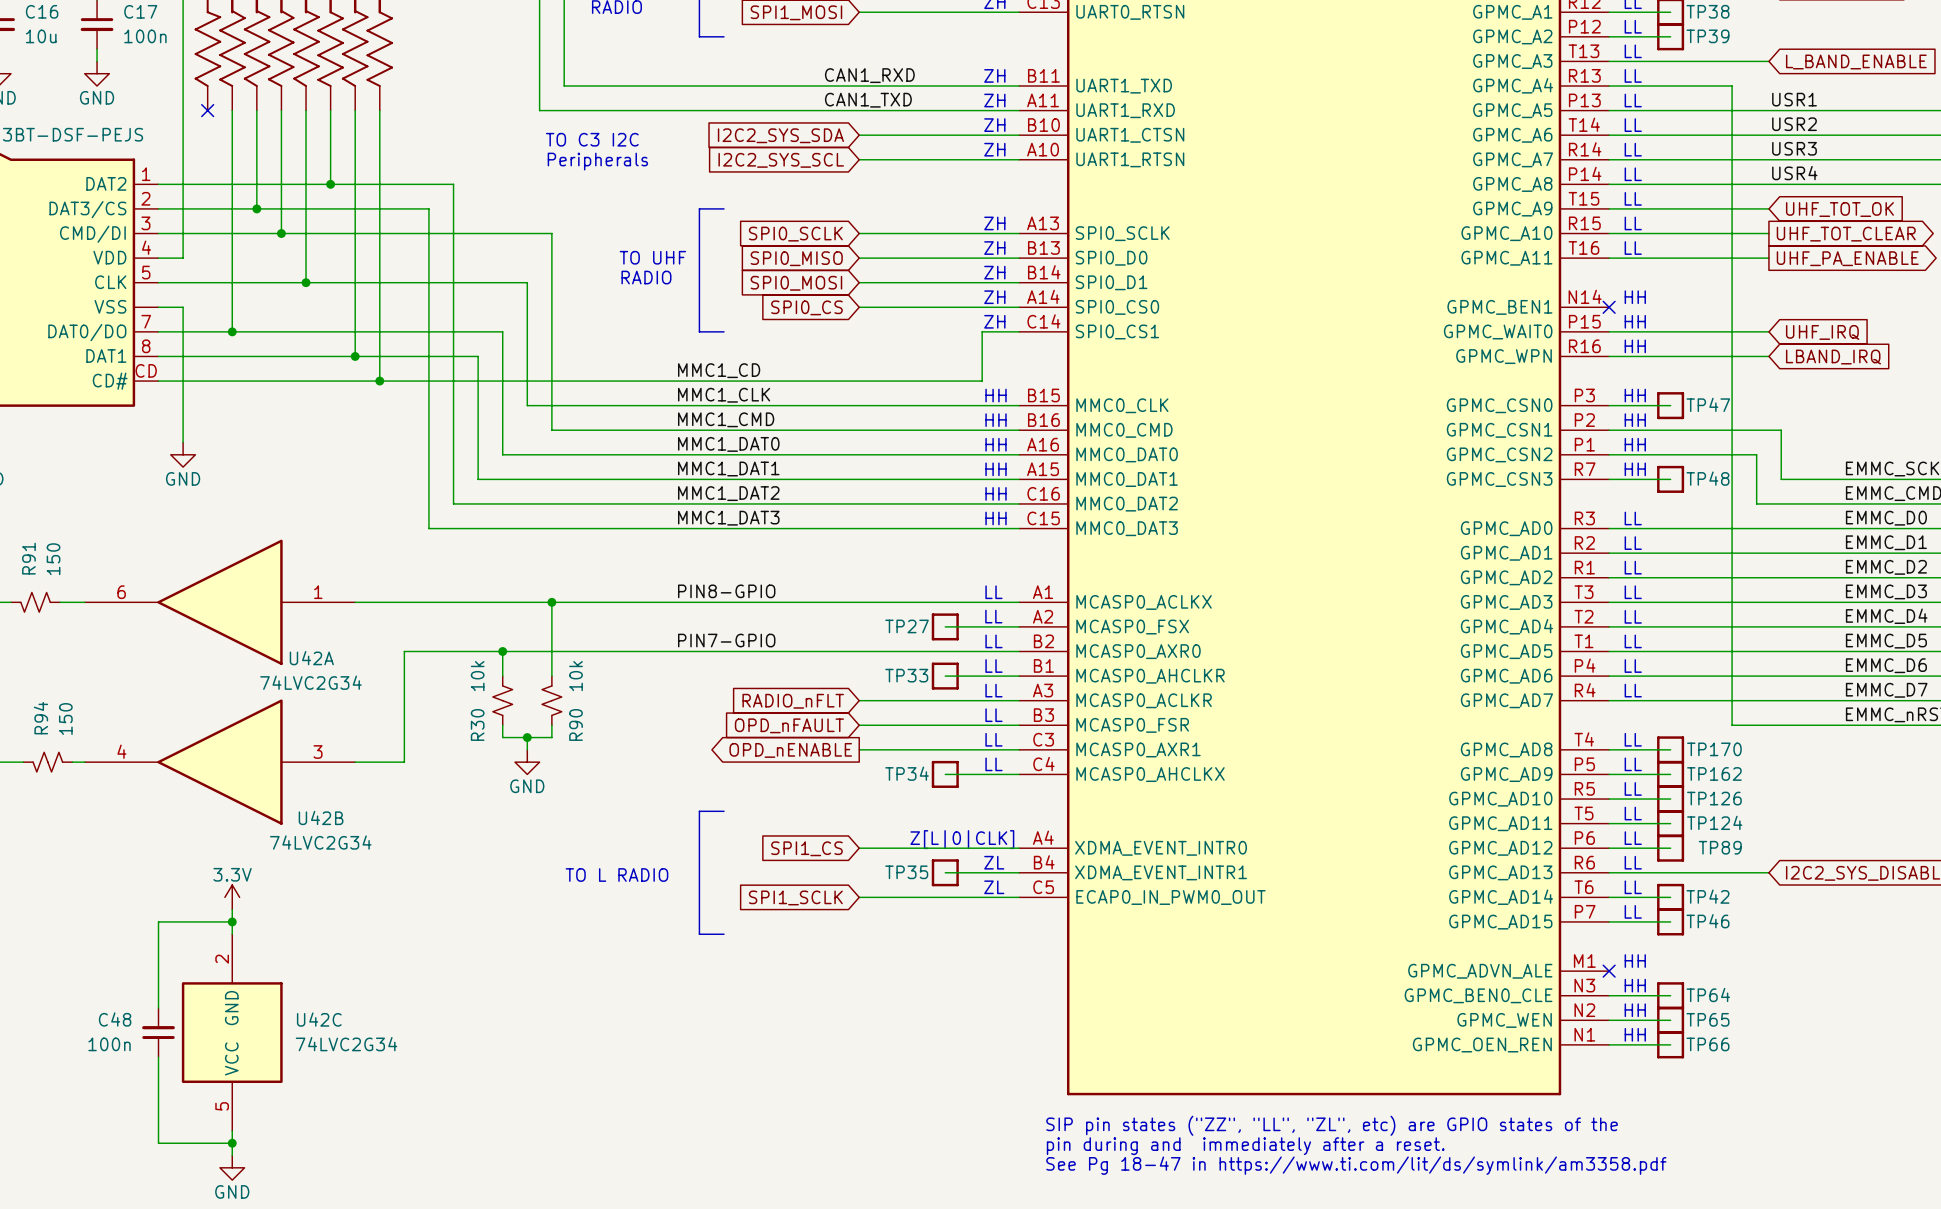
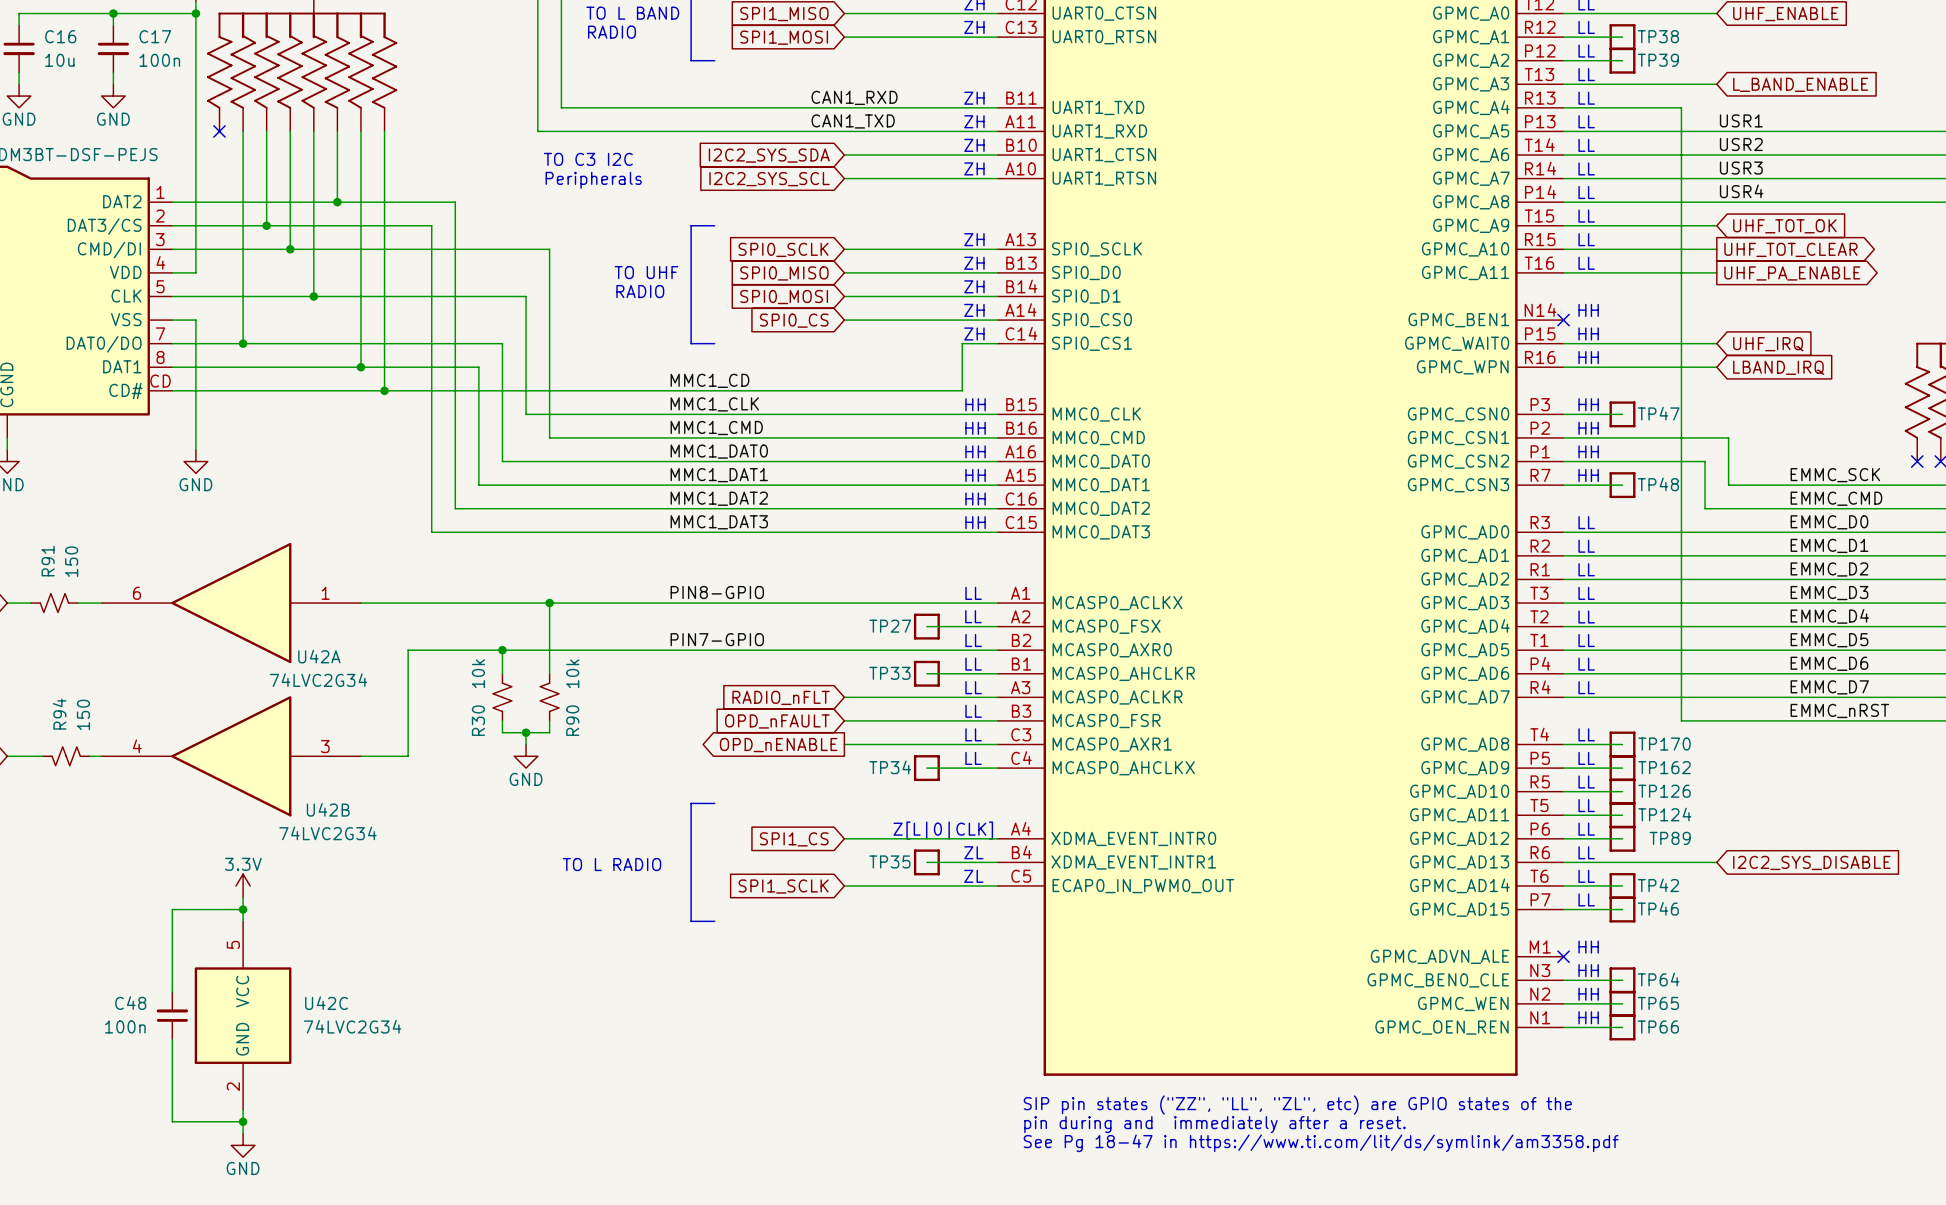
U42C rotation: 0° (232, 1032) -> 180° (243, 1015)

